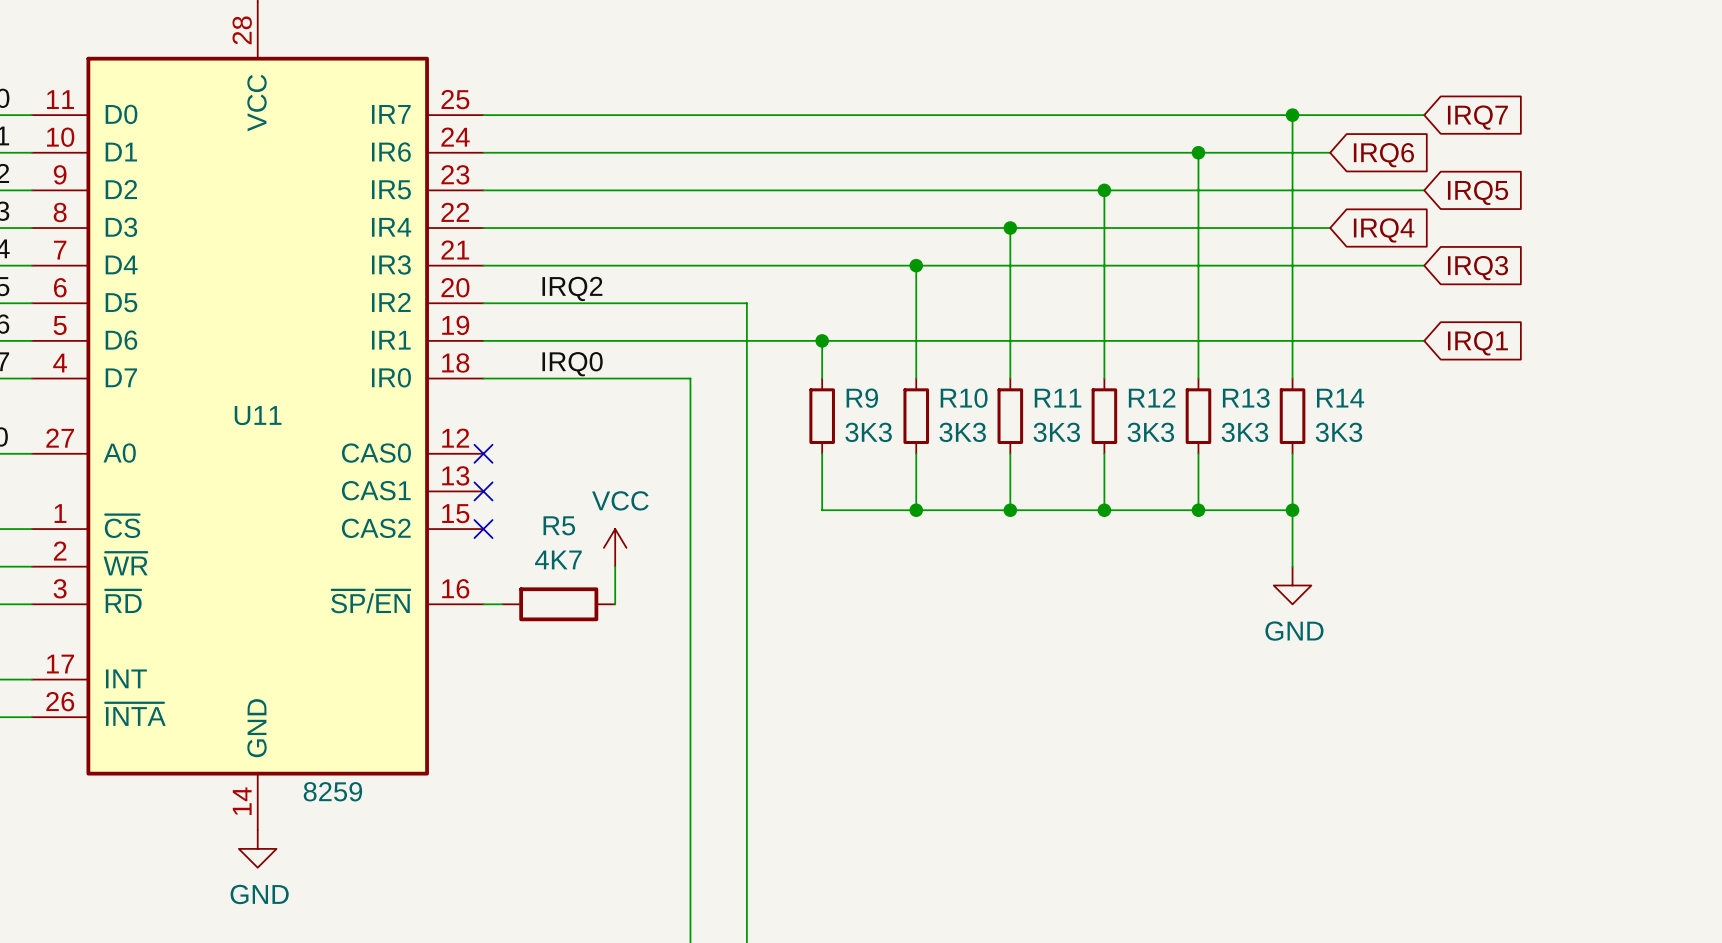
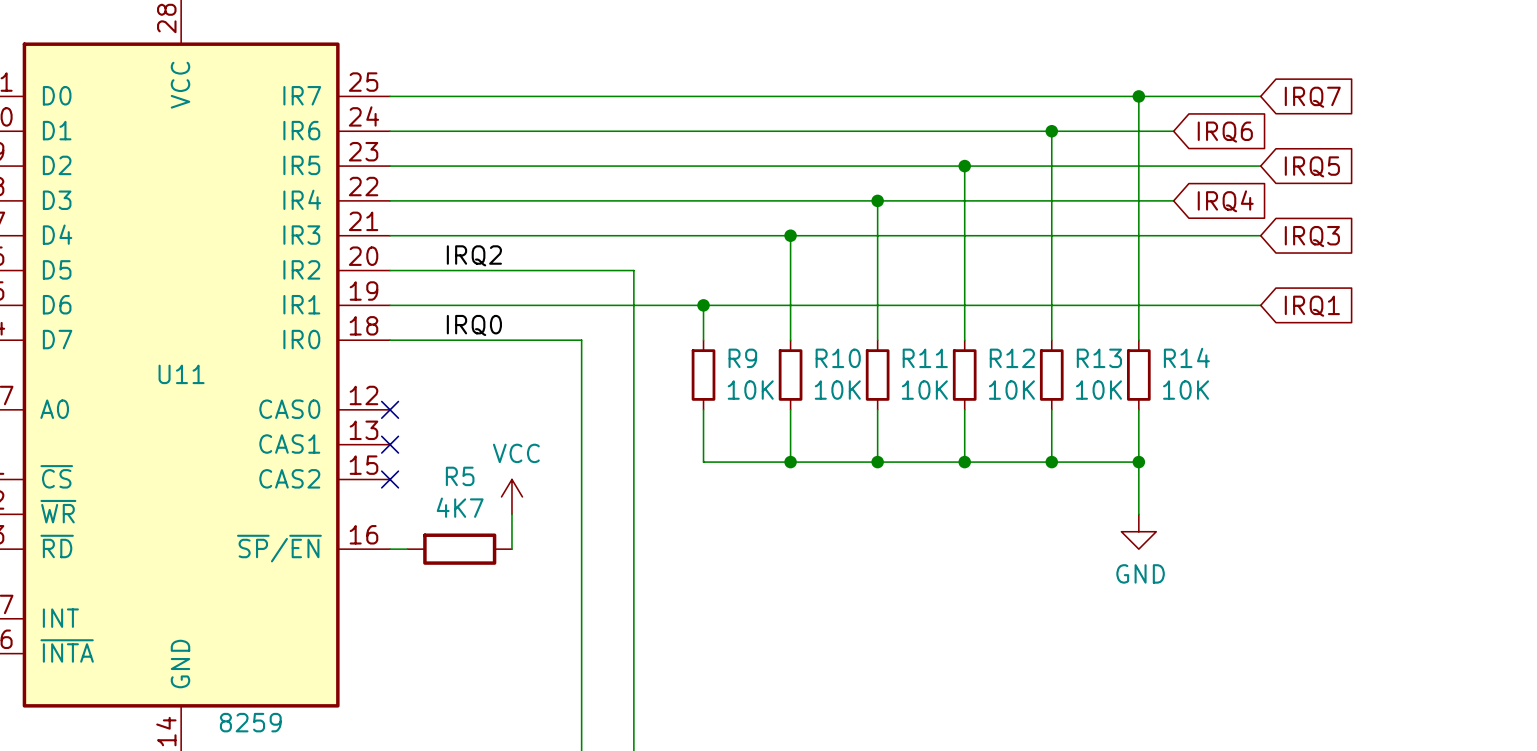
R9 value: 3K3 (868, 432) -> 10K (750, 390)
R10 value: 3K3 (962, 432) -> 10K (837, 390)
R11 value: 3K3 (1056, 432) -> 10K (924, 390)
R12 value: 3K3 (1150, 432) -> 10K (1011, 390)
R13 value: 3K3 (1244, 432) -> 10K (1098, 390)
R14 value: 3K3 (1338, 432) -> 10K (1186, 390)

